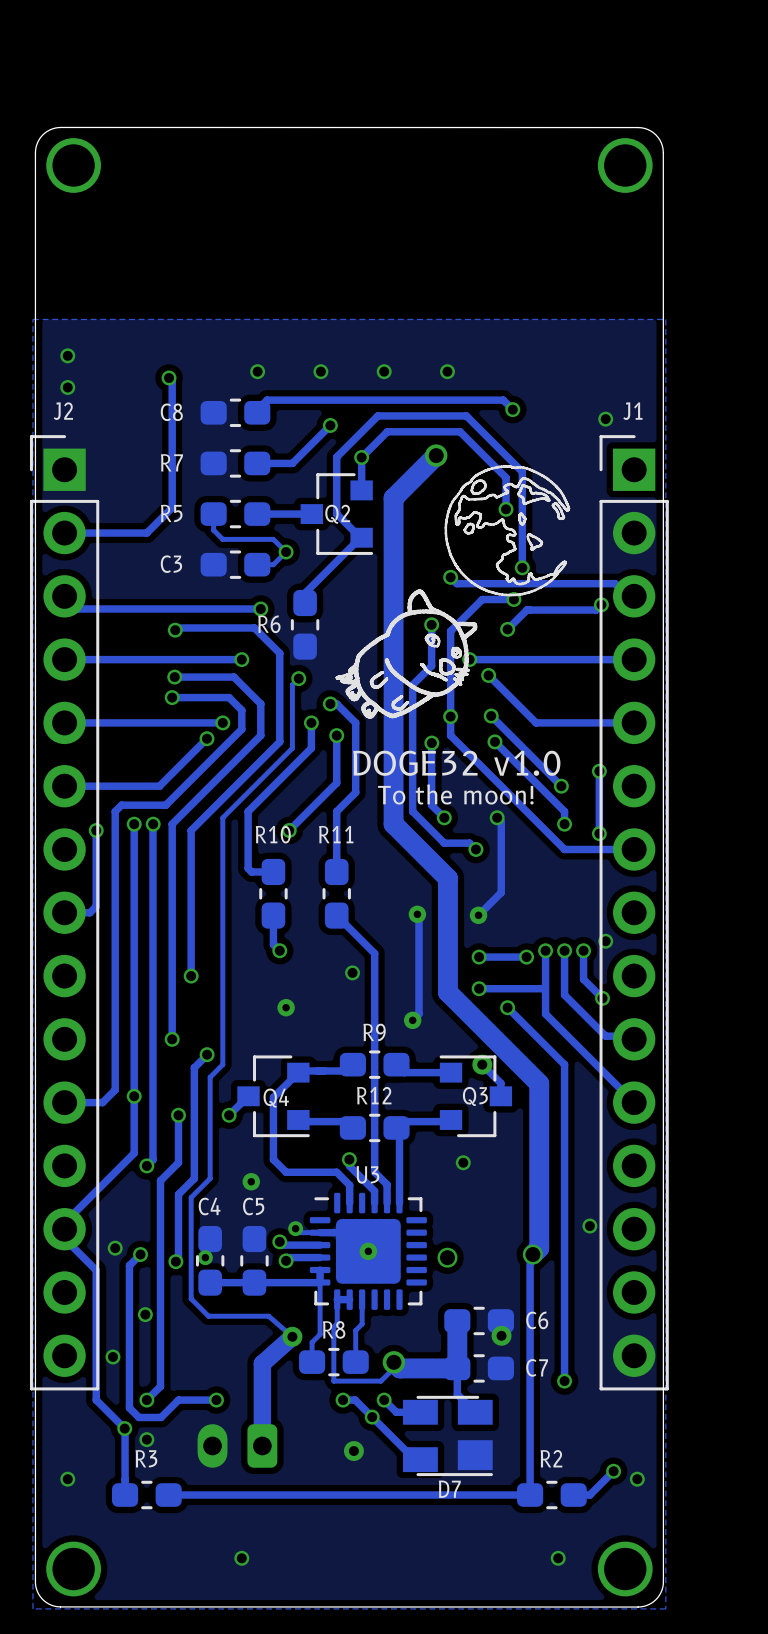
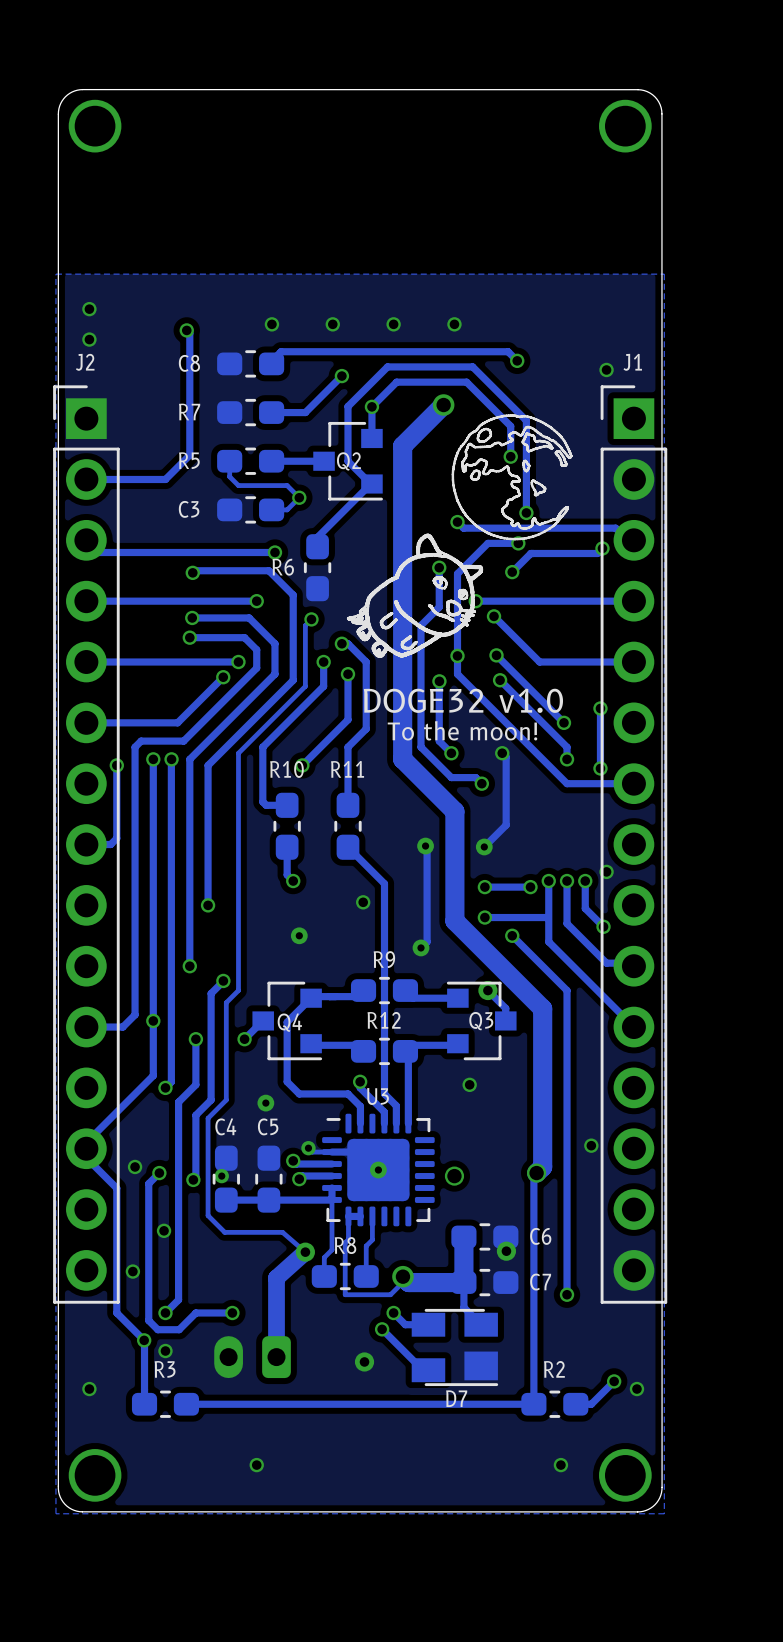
track: (343, 1400) (355, 1400) (372, 1417) -> none
via: (343, 1400) -> none

